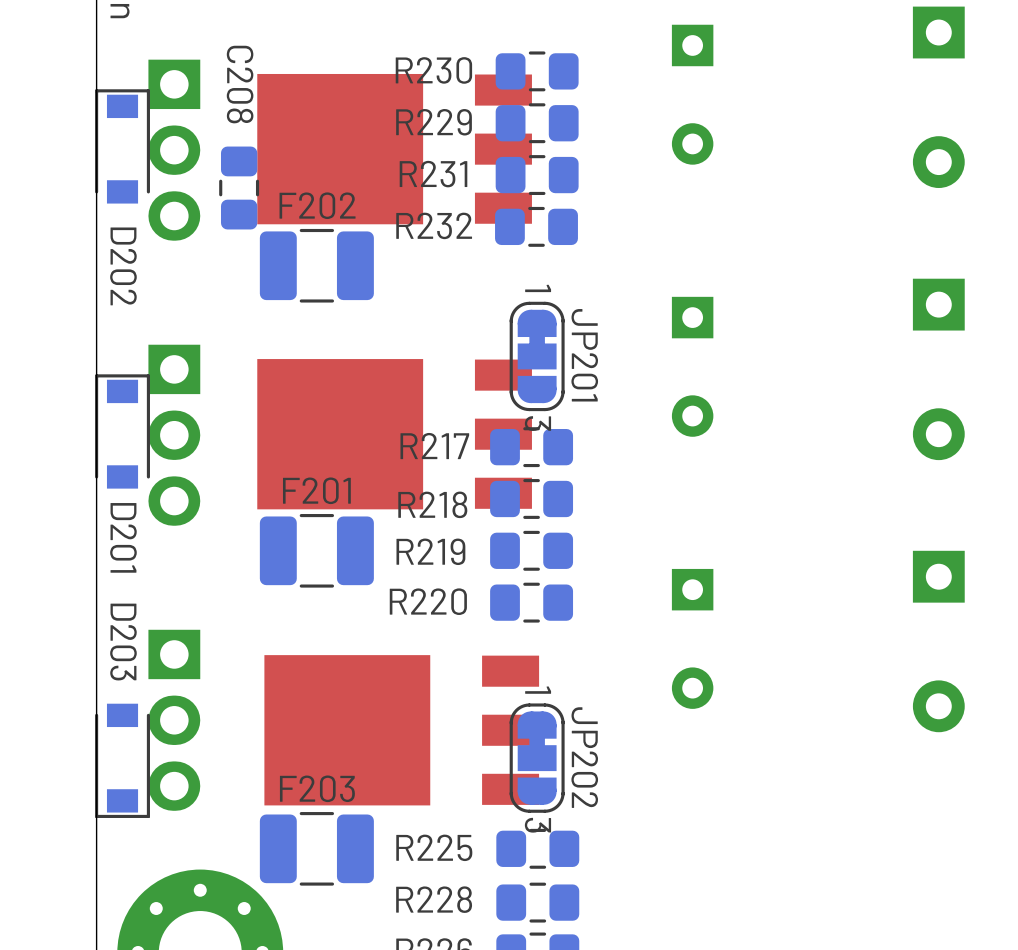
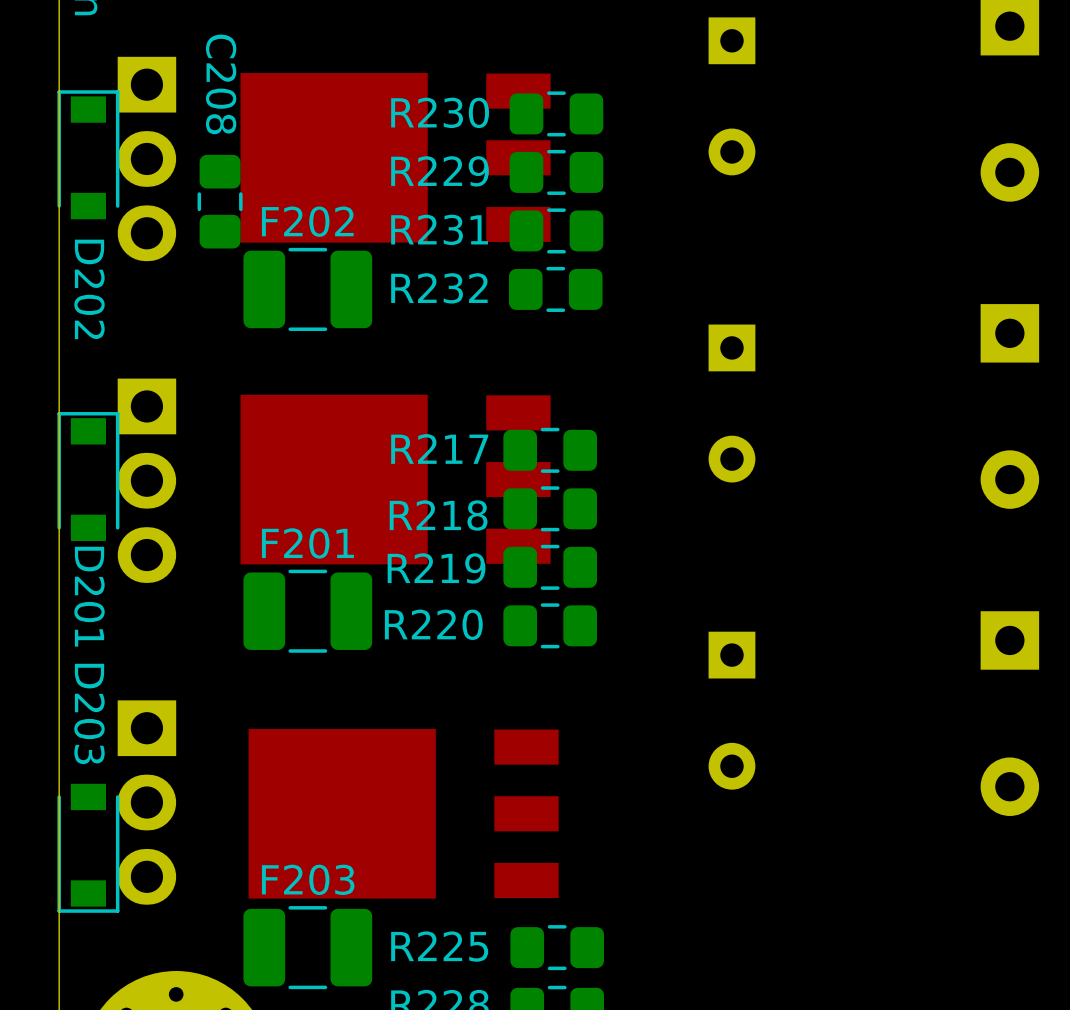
R230 position: (537, 71) -> (556, 113)
R229 position: (537, 123) -> (556, 172)
R231 position: (537, 175) -> (556, 230)
R232 position: (536, 226) -> (555, 289)
JP201: (537, 356) -> none
R217 position: (531, 447) -> (550, 450)
R218 position: (531, 498) -> (550, 508)
R219 position: (531, 550) -> (550, 567)
R220 position: (531, 602) -> (550, 625)
JP202: (537, 758) -> none

